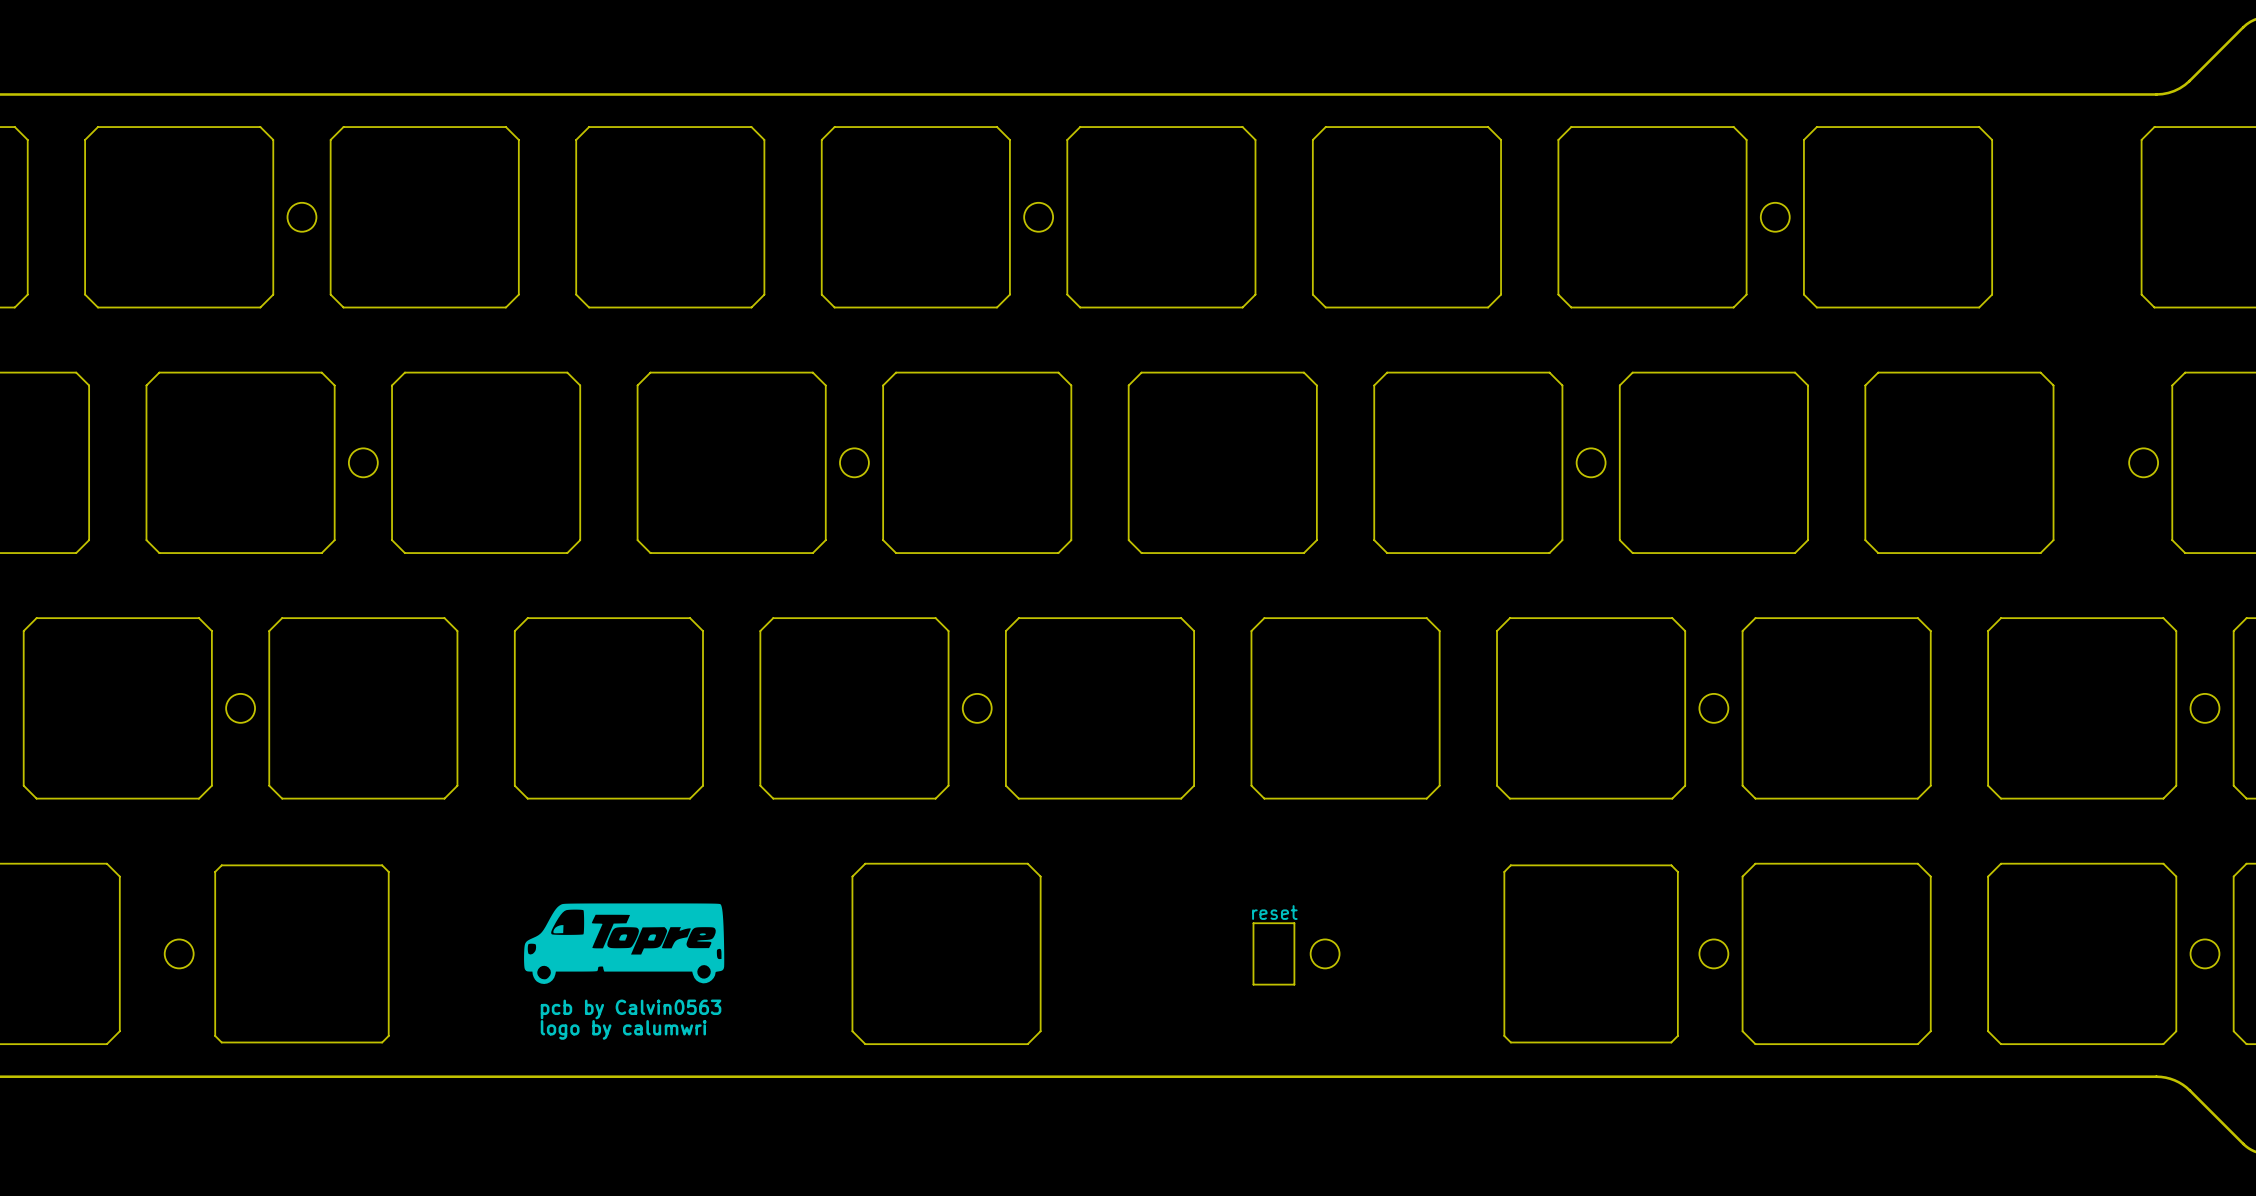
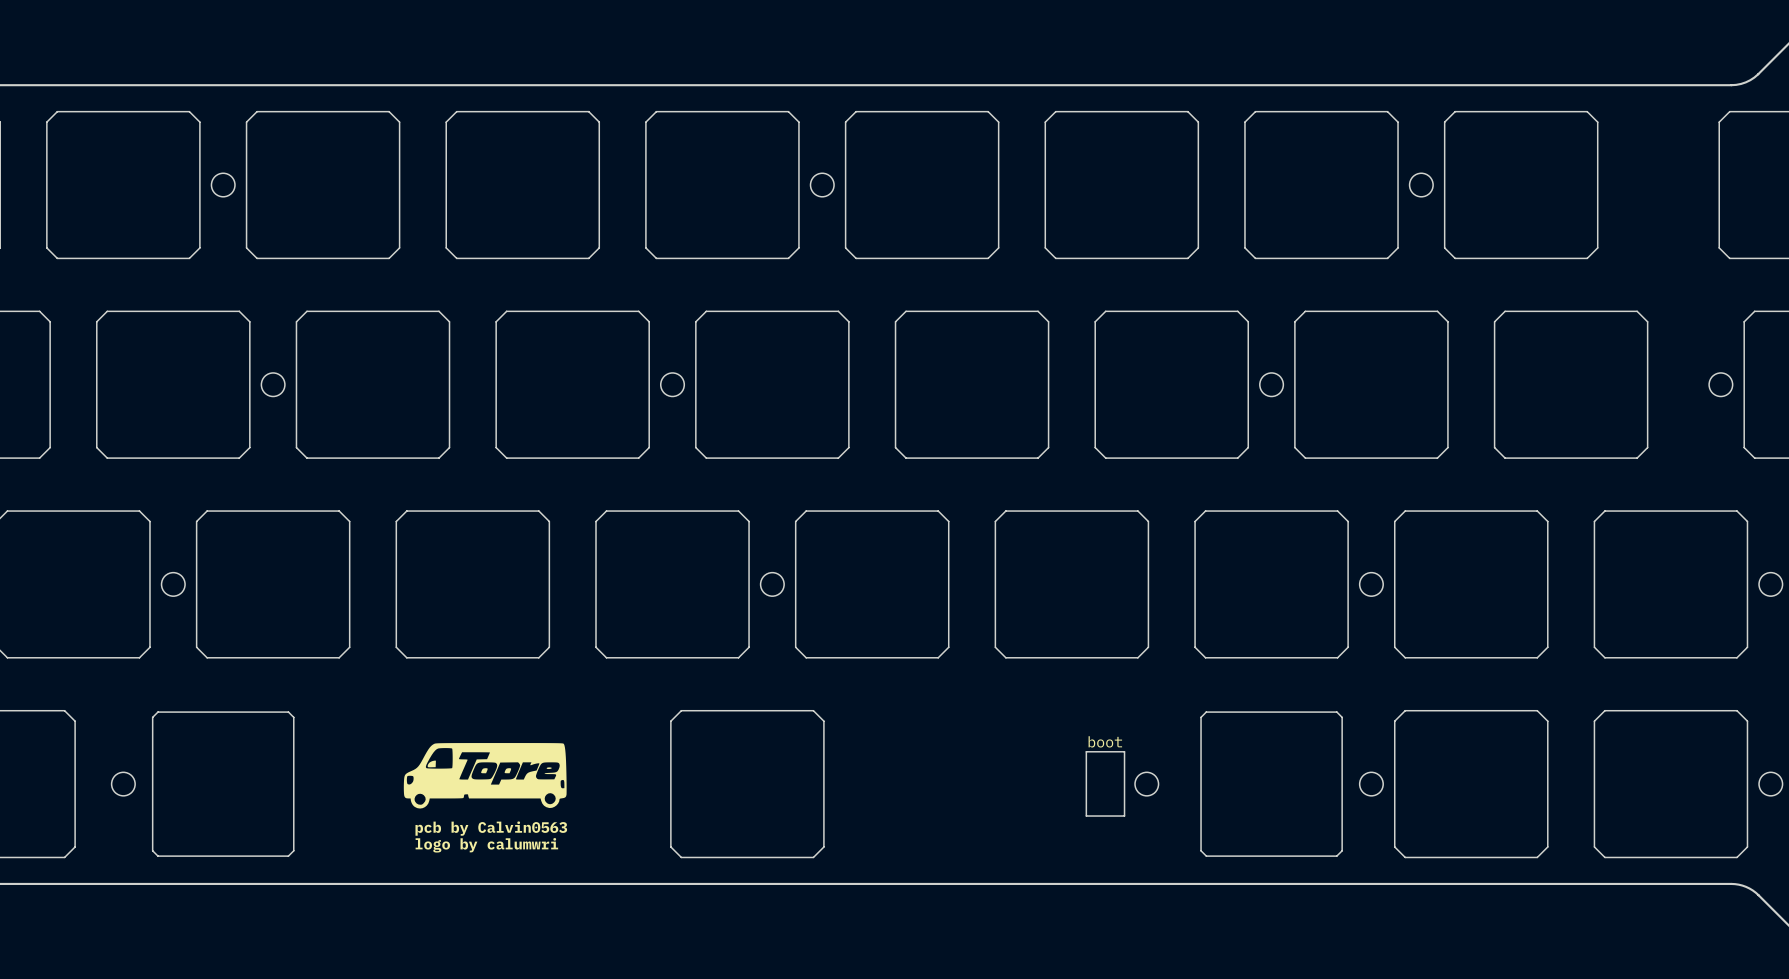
text: none -> boot (1105, 741)
text: reset (1274, 912) -> none
board edge: none -> (1086, 751) (1124, 751) (1124, 816) (1086, 816) (1086, 751)
board edge: (1253, 923) (1253, 984) (1294, 984) (1294, 923) (1253, 923) -> none
round board edge position: (1325, 953) -> (1146, 784)

